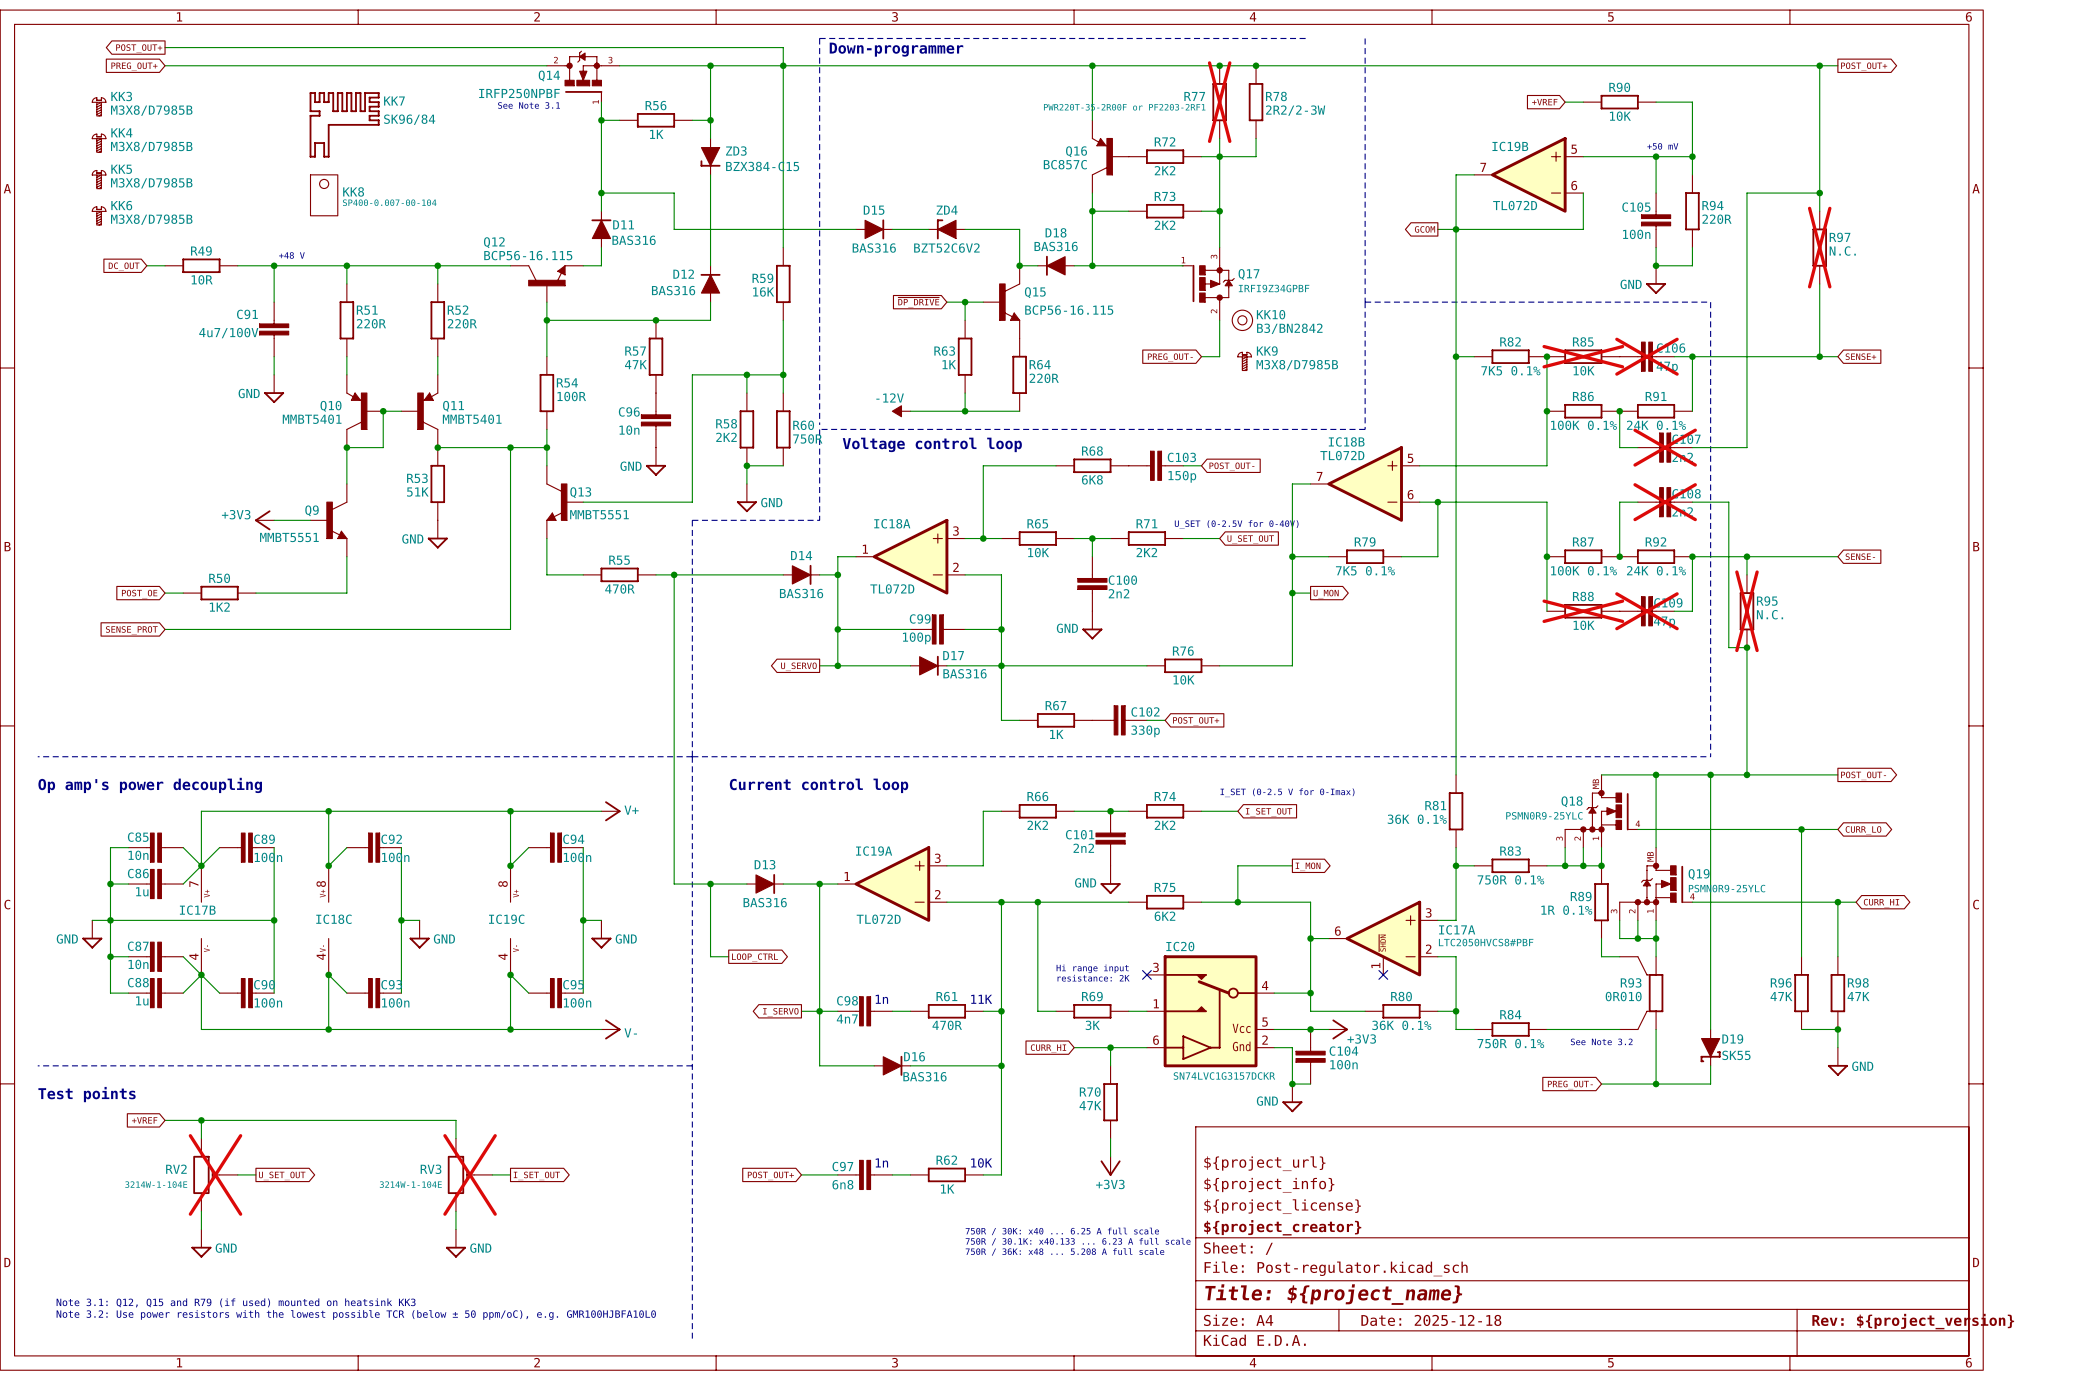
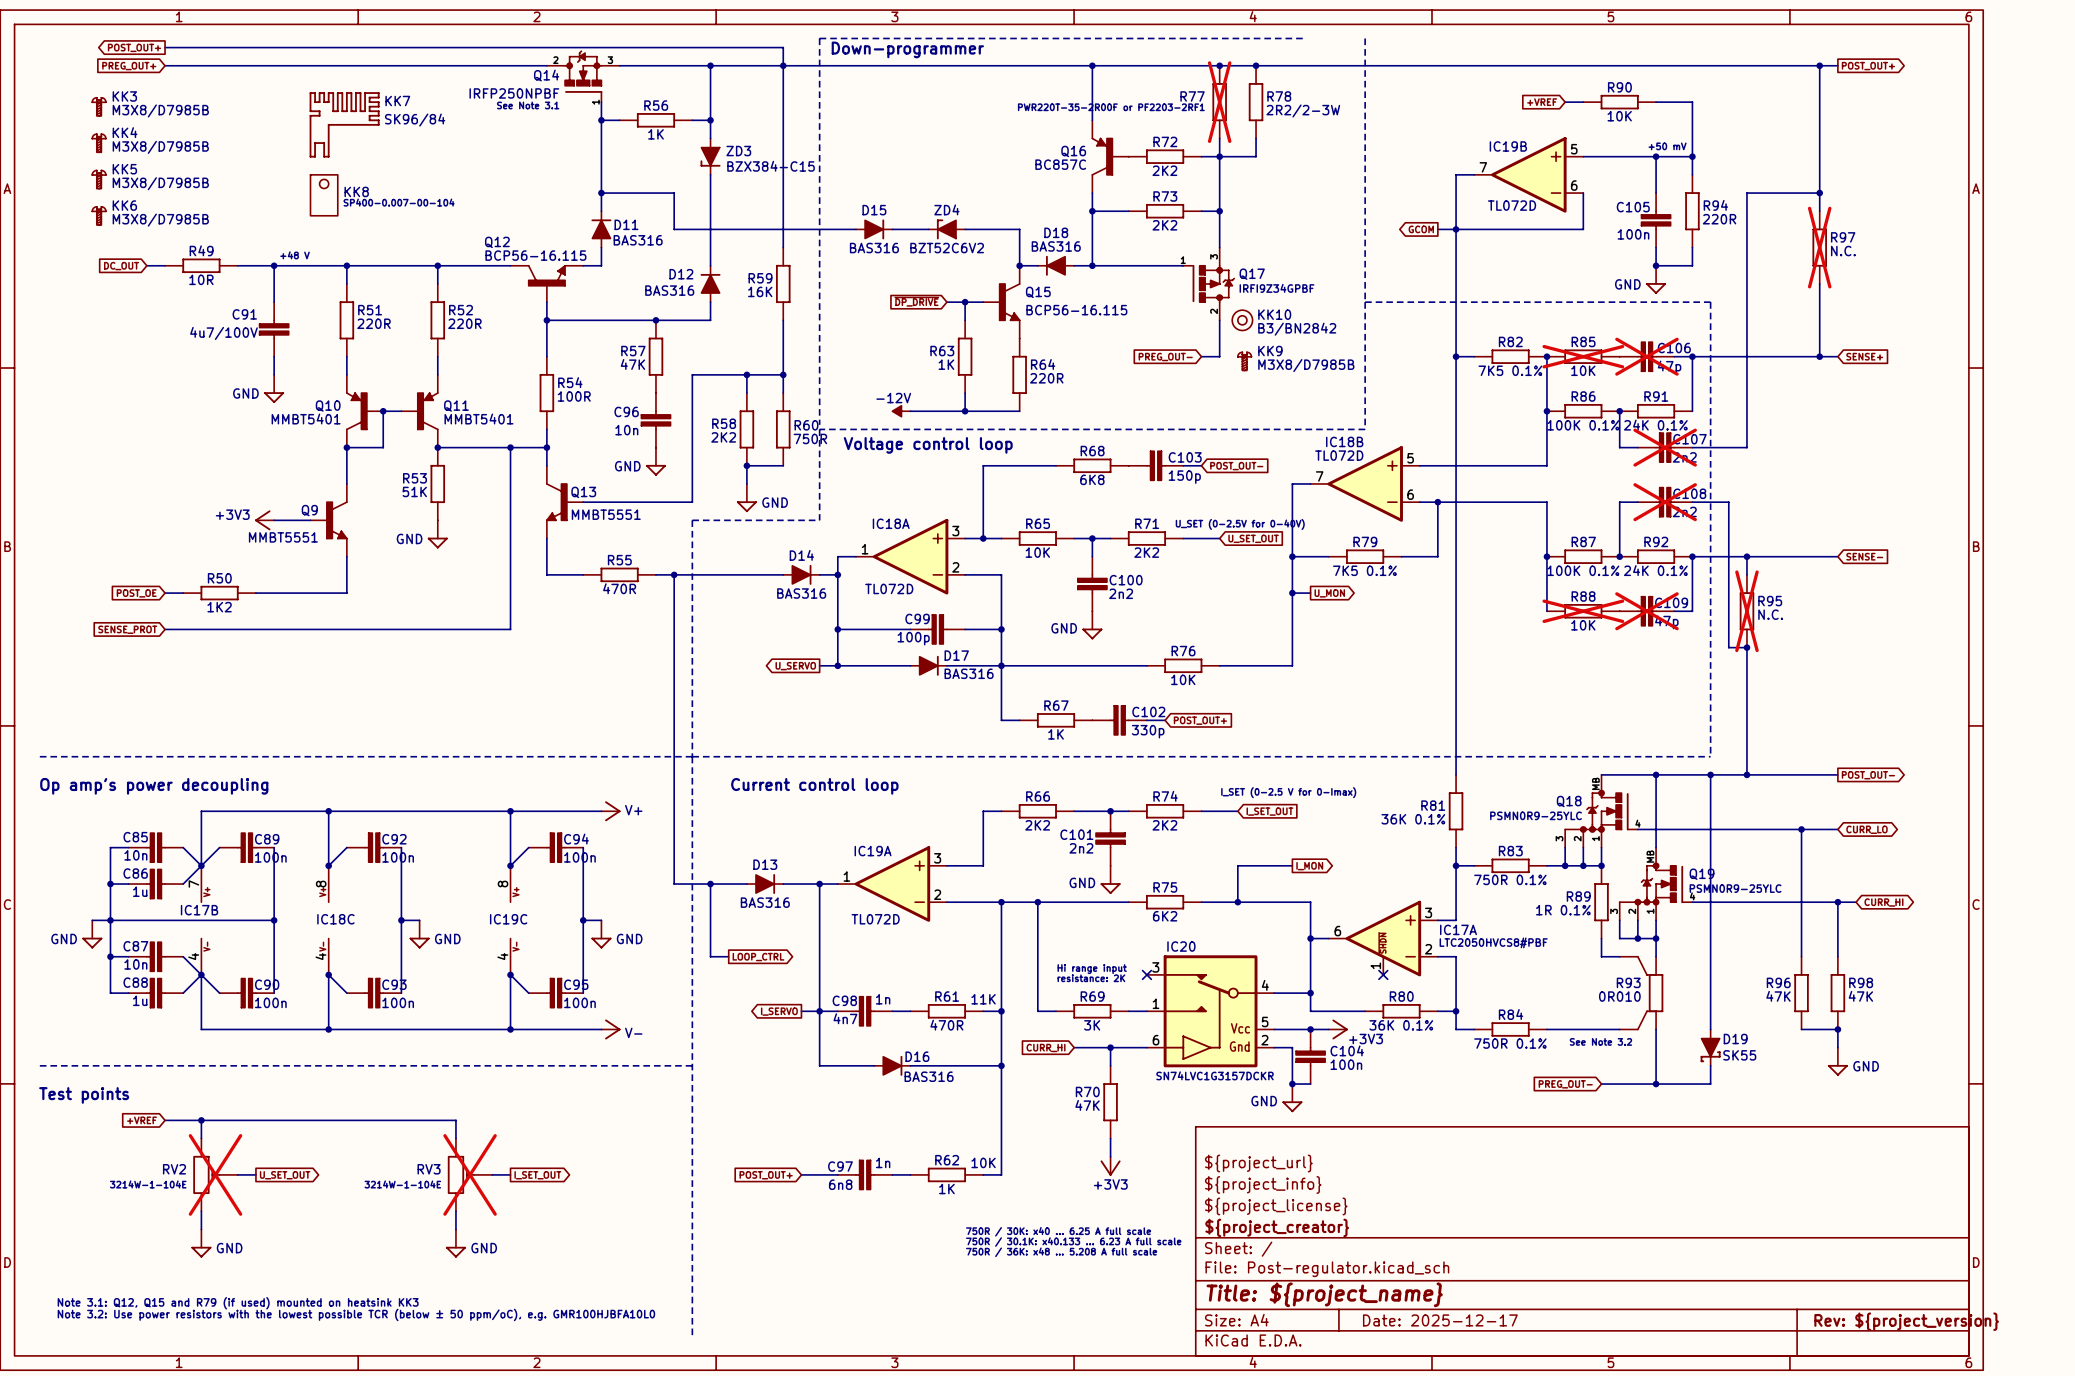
title block: Date: 2025-12-18 (1431, 1320) -> Date: 2025-12-17 (1440, 1320)

